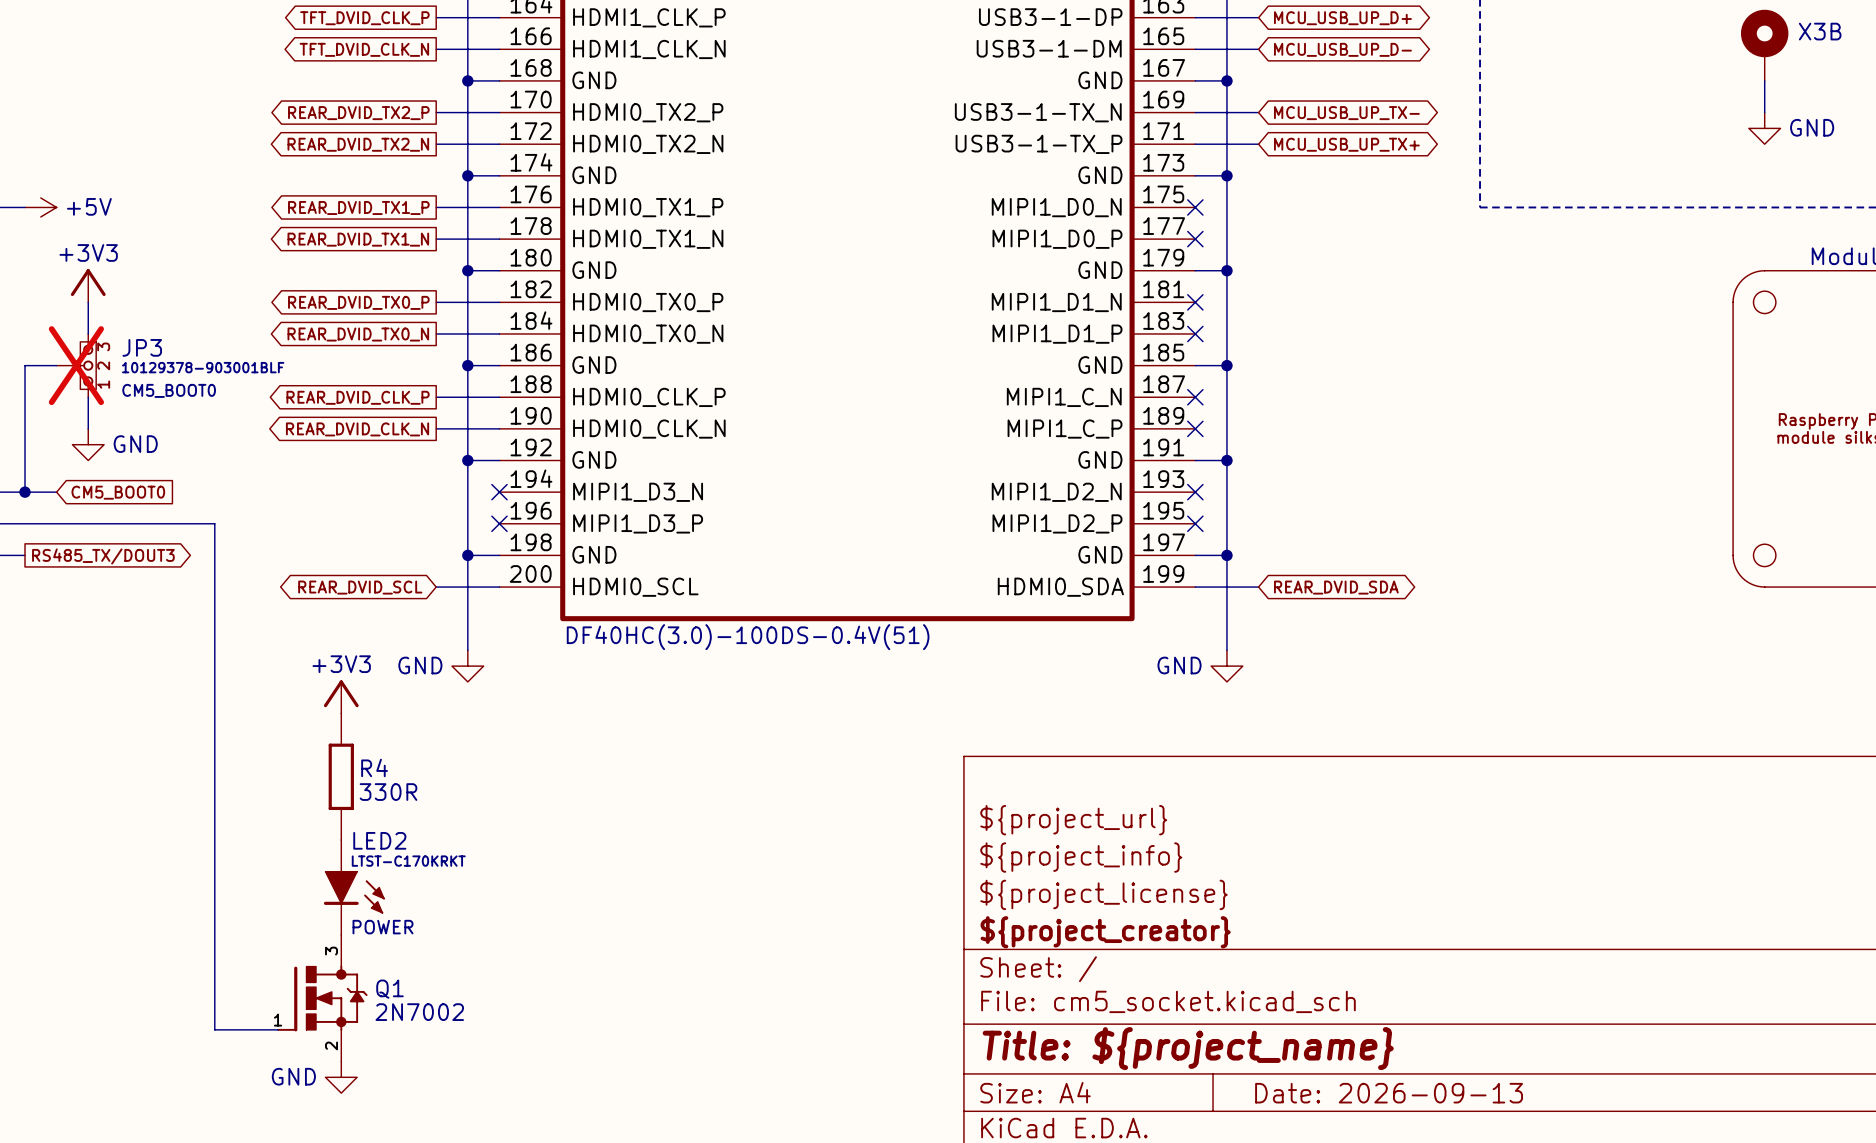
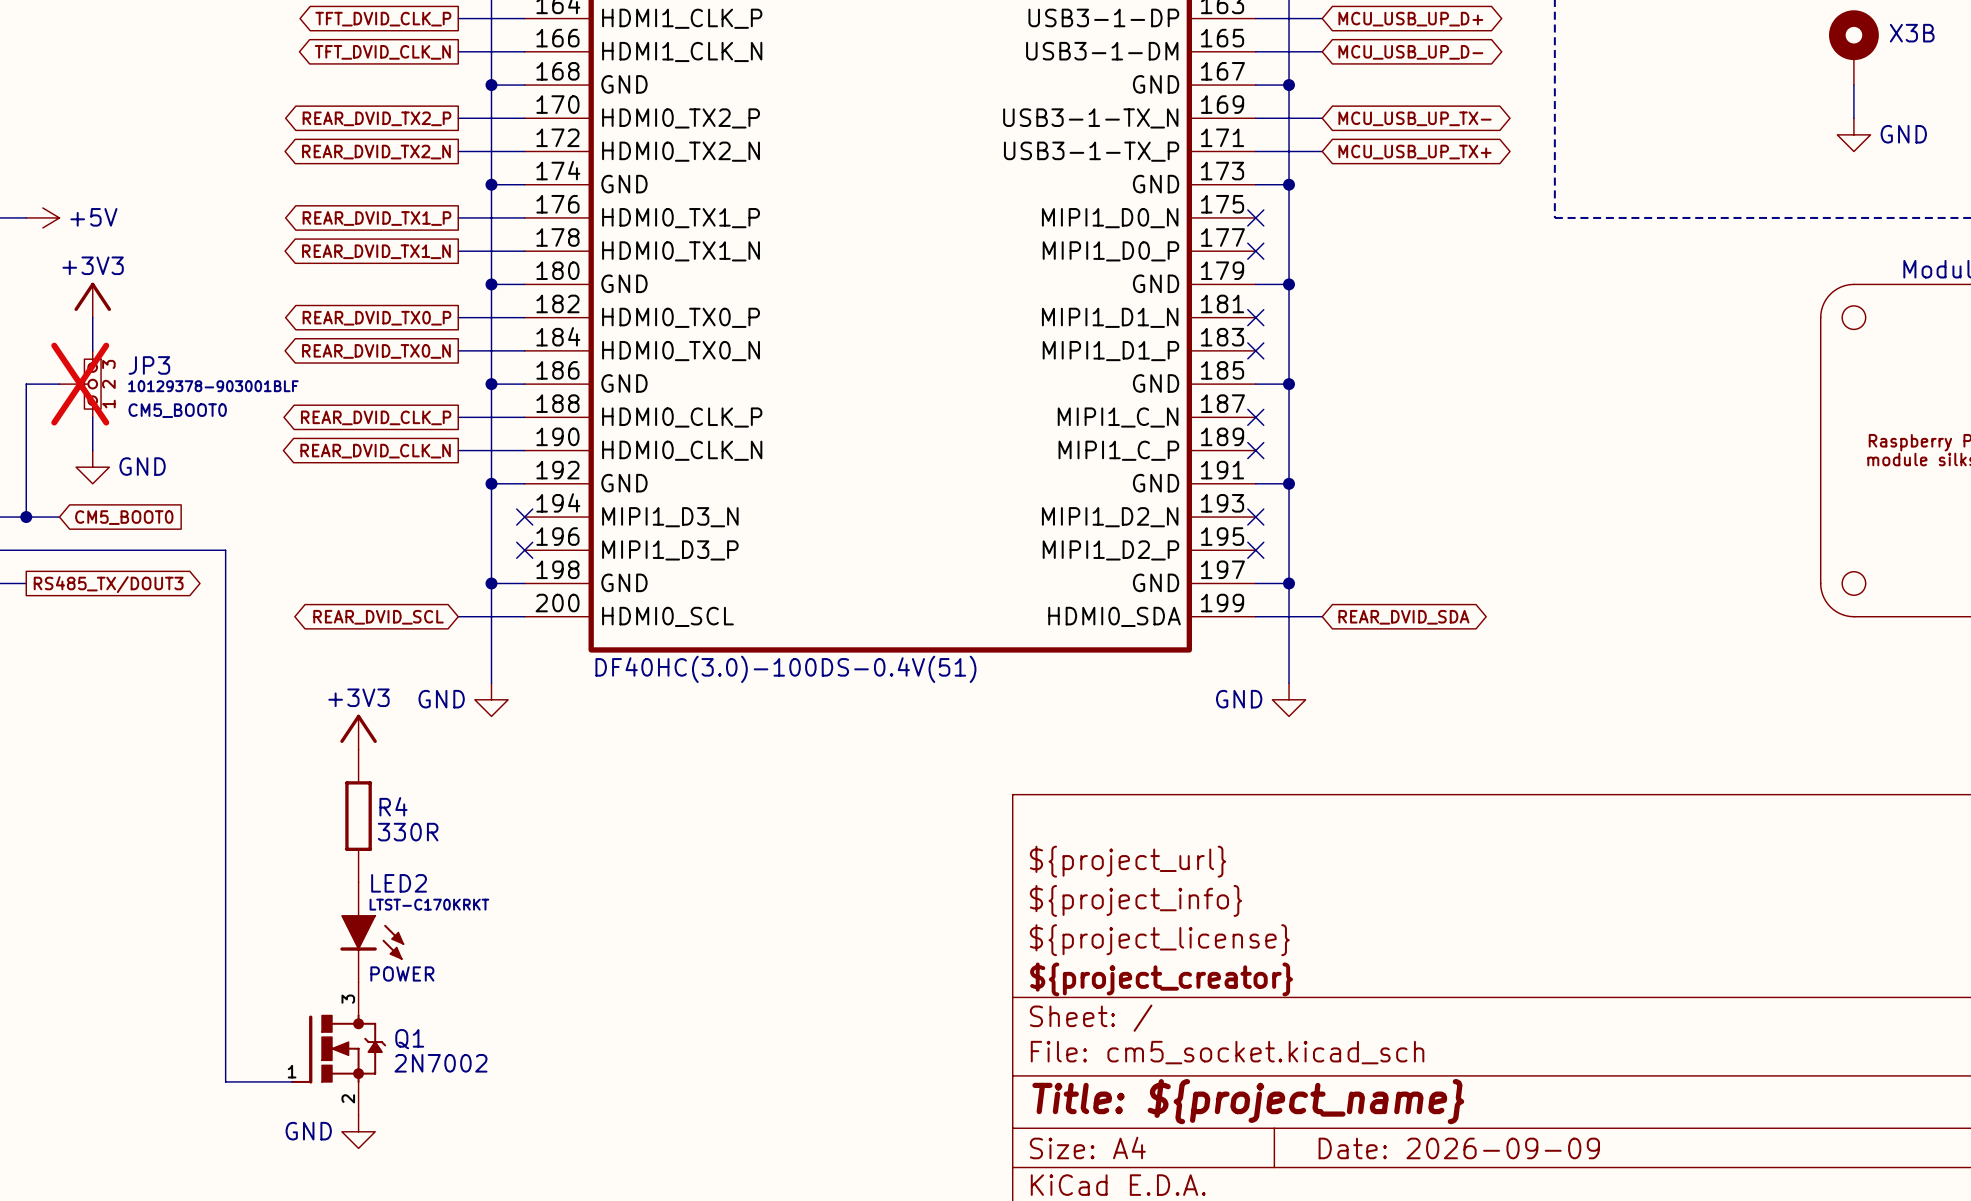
title block: Date: 2026-09-13 (1389, 1093) -> Date: 2026-09-09 (1459, 1148)

